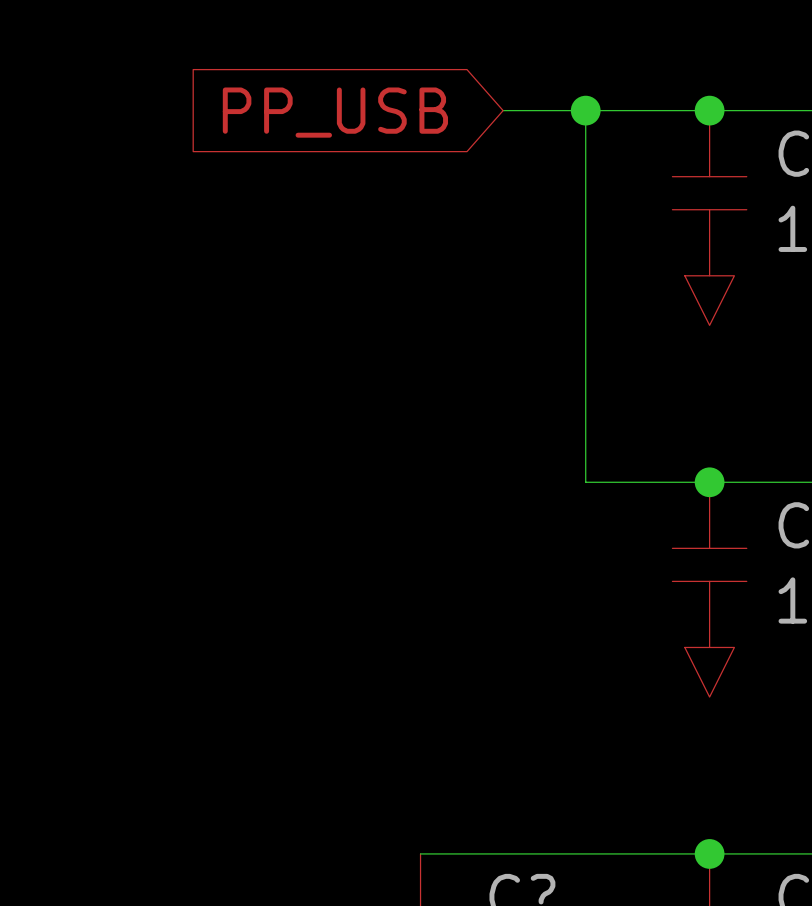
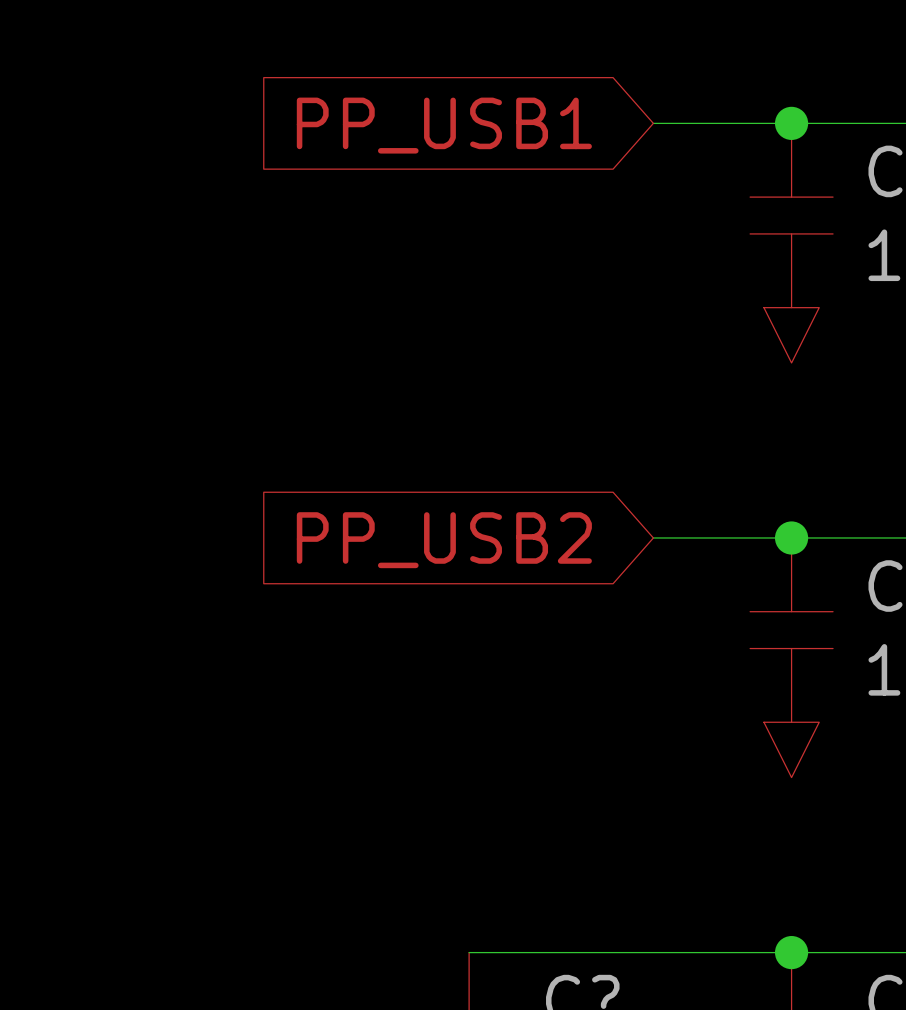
wire: (503, 110) (585, 110) (585, 482) -> none
junction: (585, 110) -> none
global label: PP_USB (335, 112) -> PP_USB1 (444, 125)
global label: none -> PP_USB2 (444, 540)

